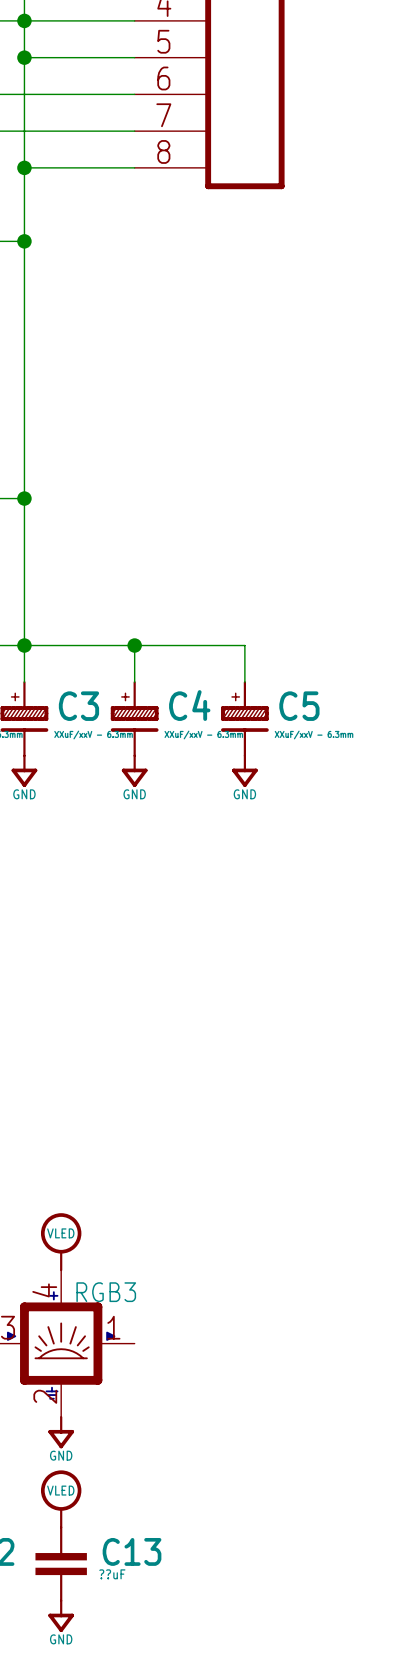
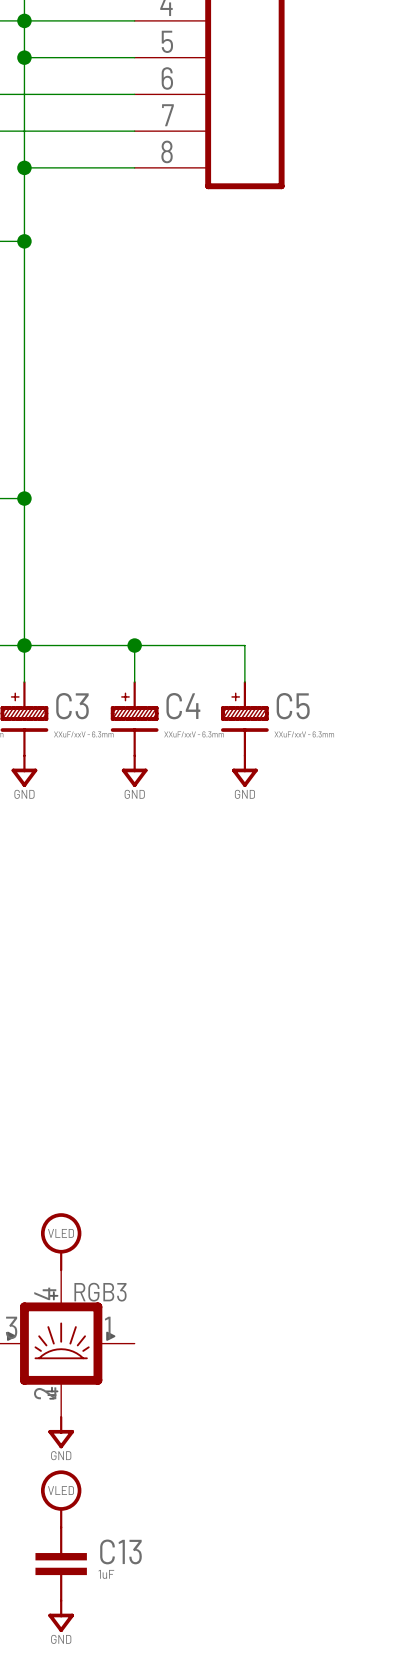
C13 value: ??uF (112, 1574) -> 1uF (106, 1574)

